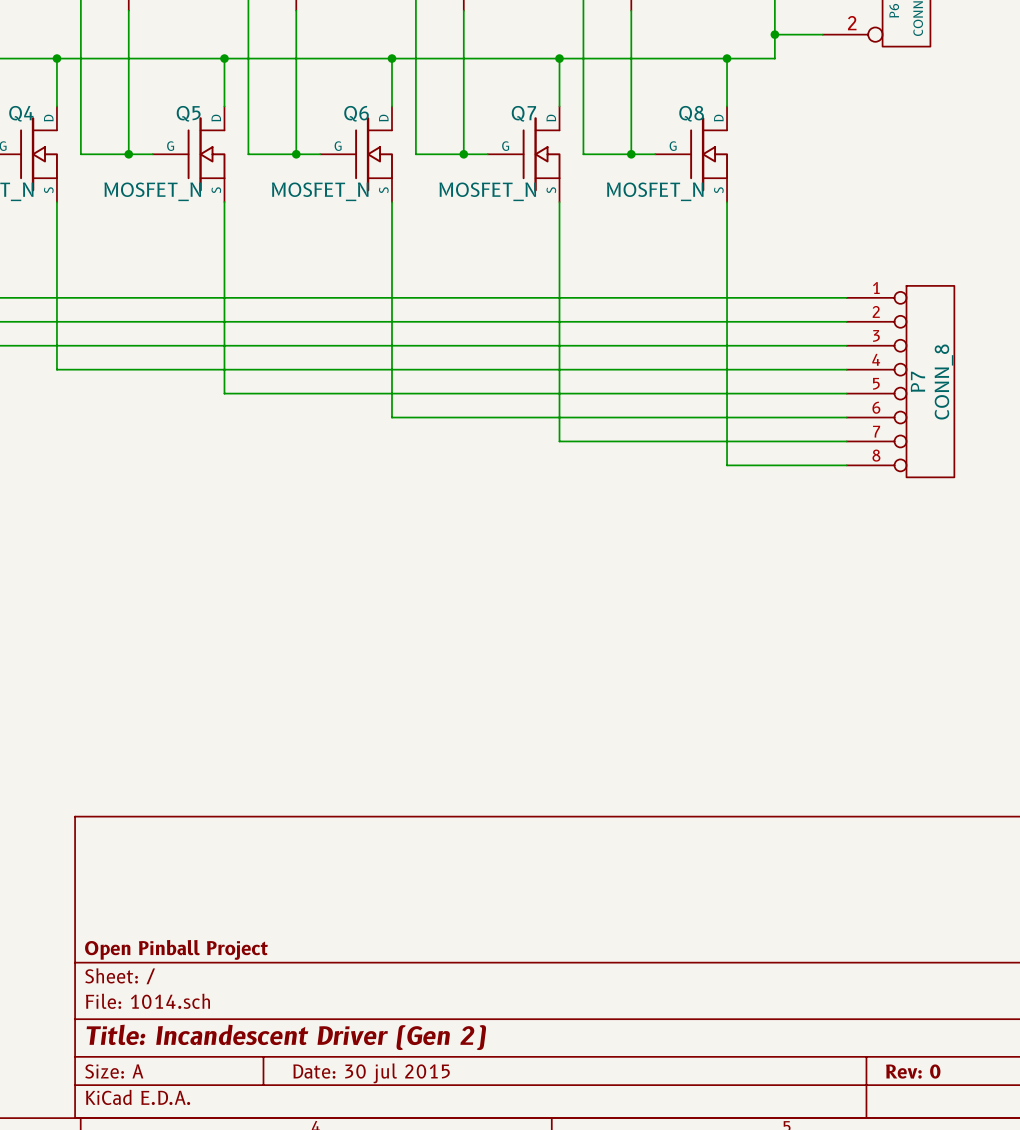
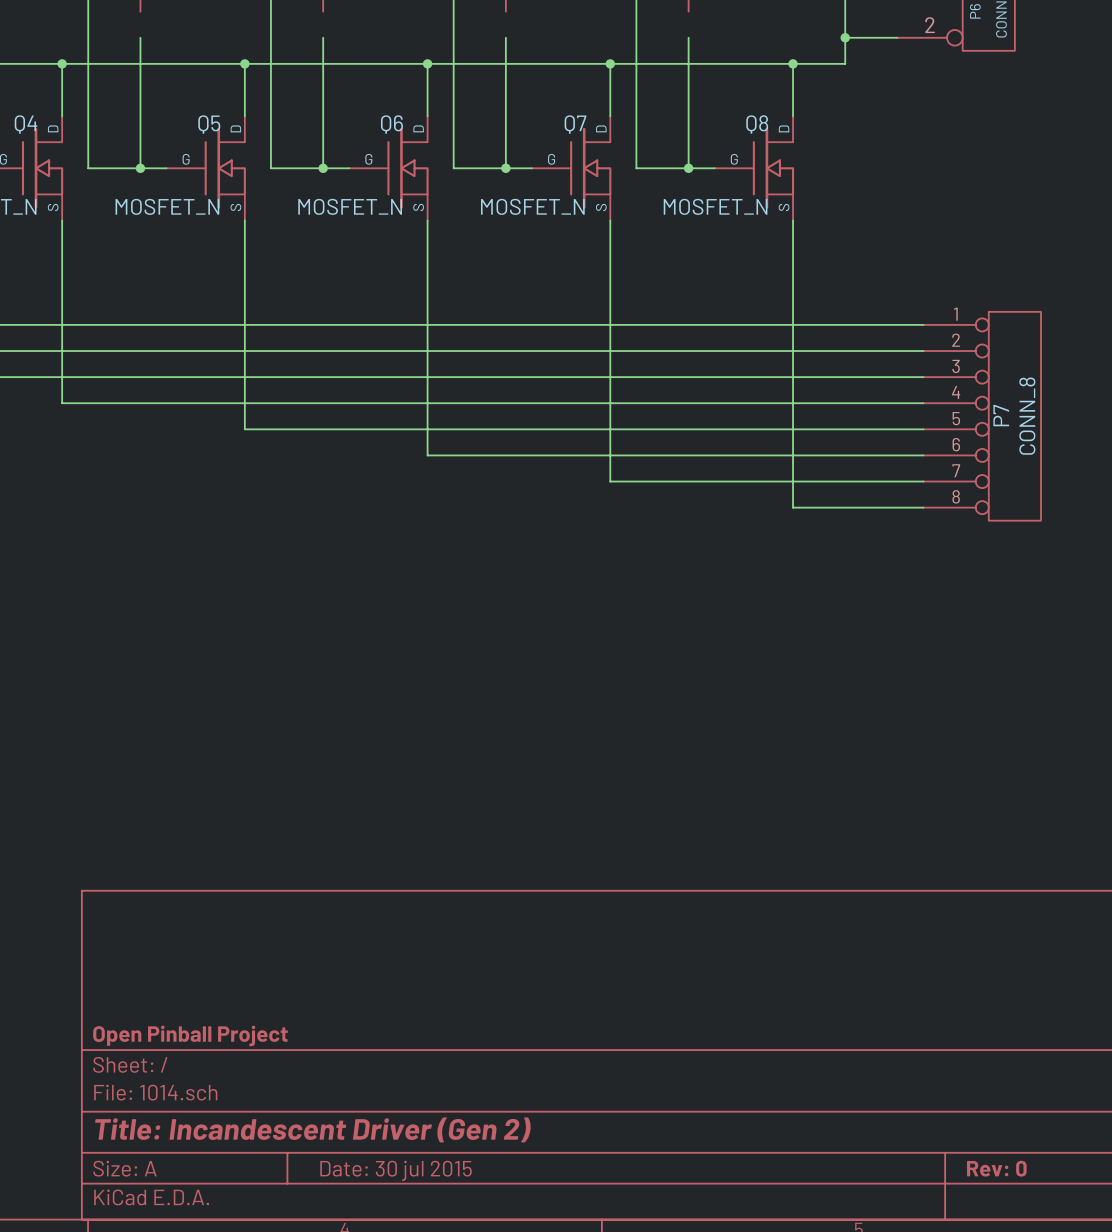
wire: (128, 10) (128, 34) -> none
wire: (296, 10) (296, 34) -> none
wire: (463, 10) (463, 34) -> none
wire: (631, 10) (631, 34) -> none

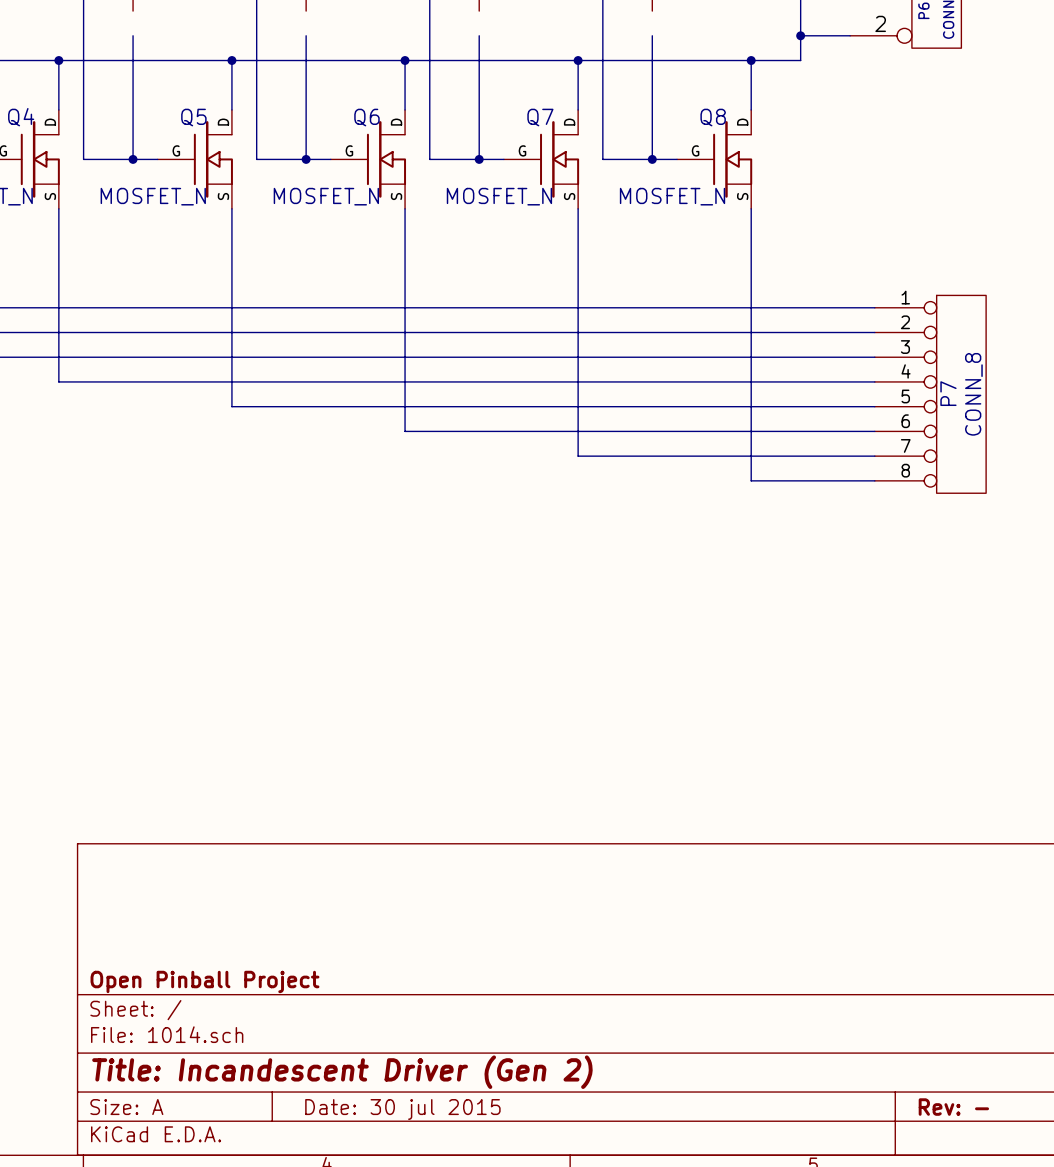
title block: Rev: 0 (996, 1168) -> Rev: - (953, 1107)

